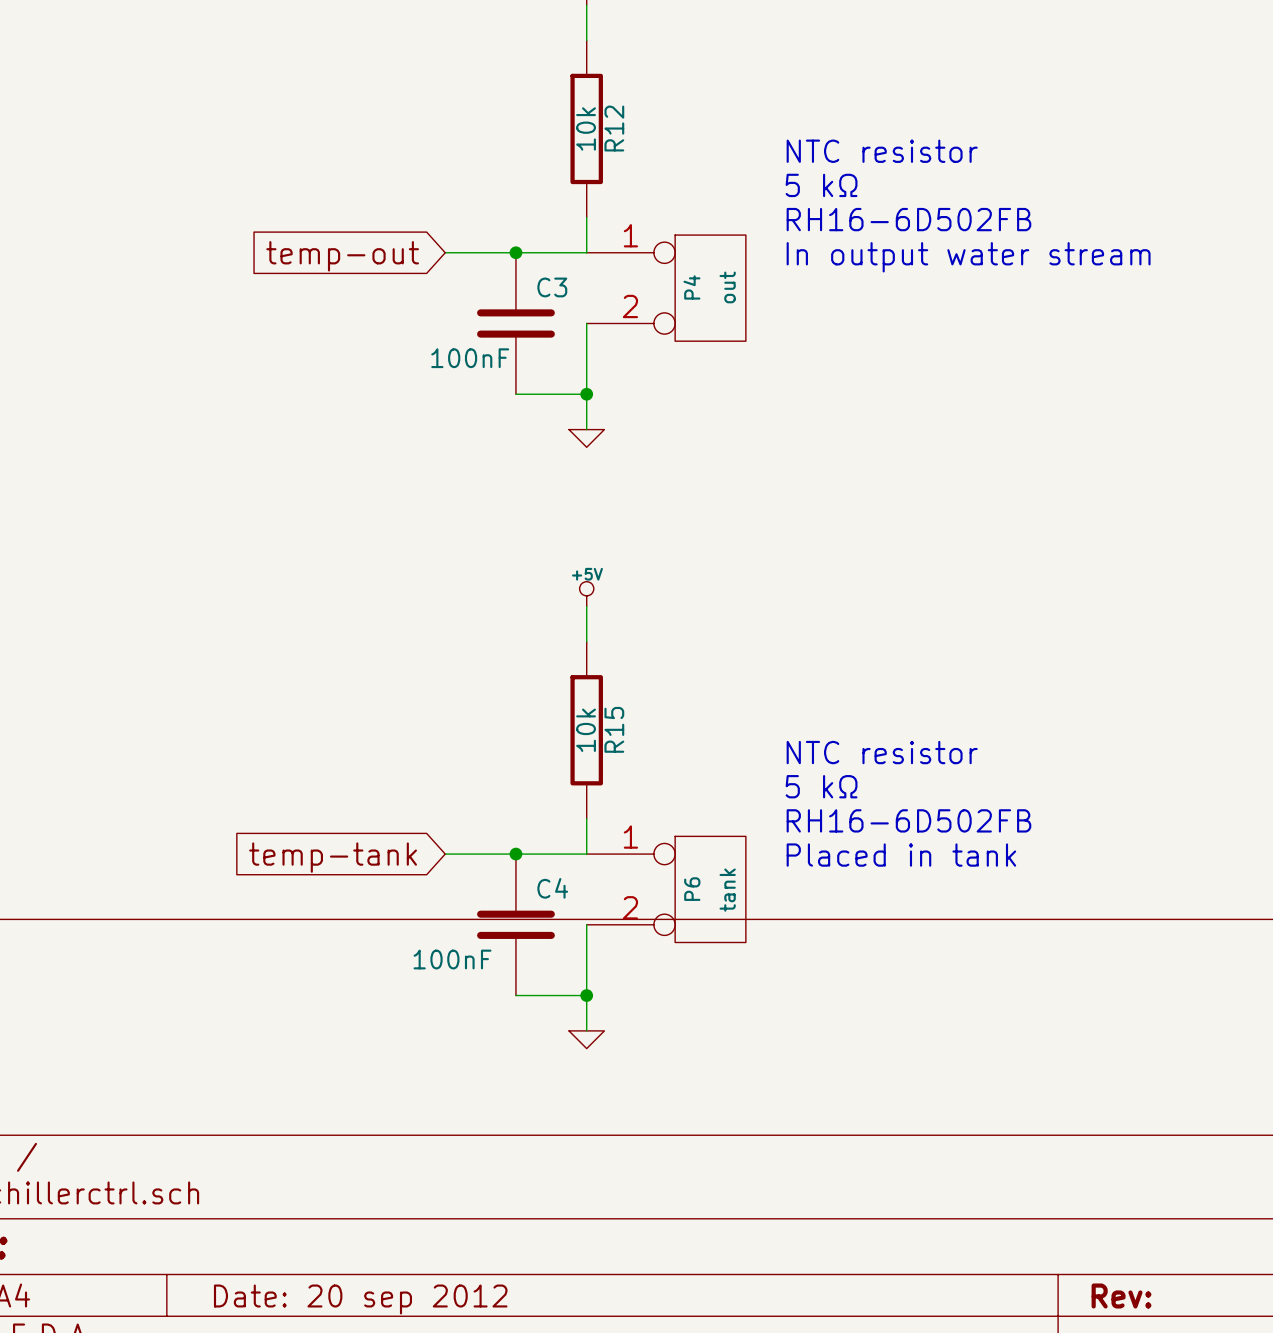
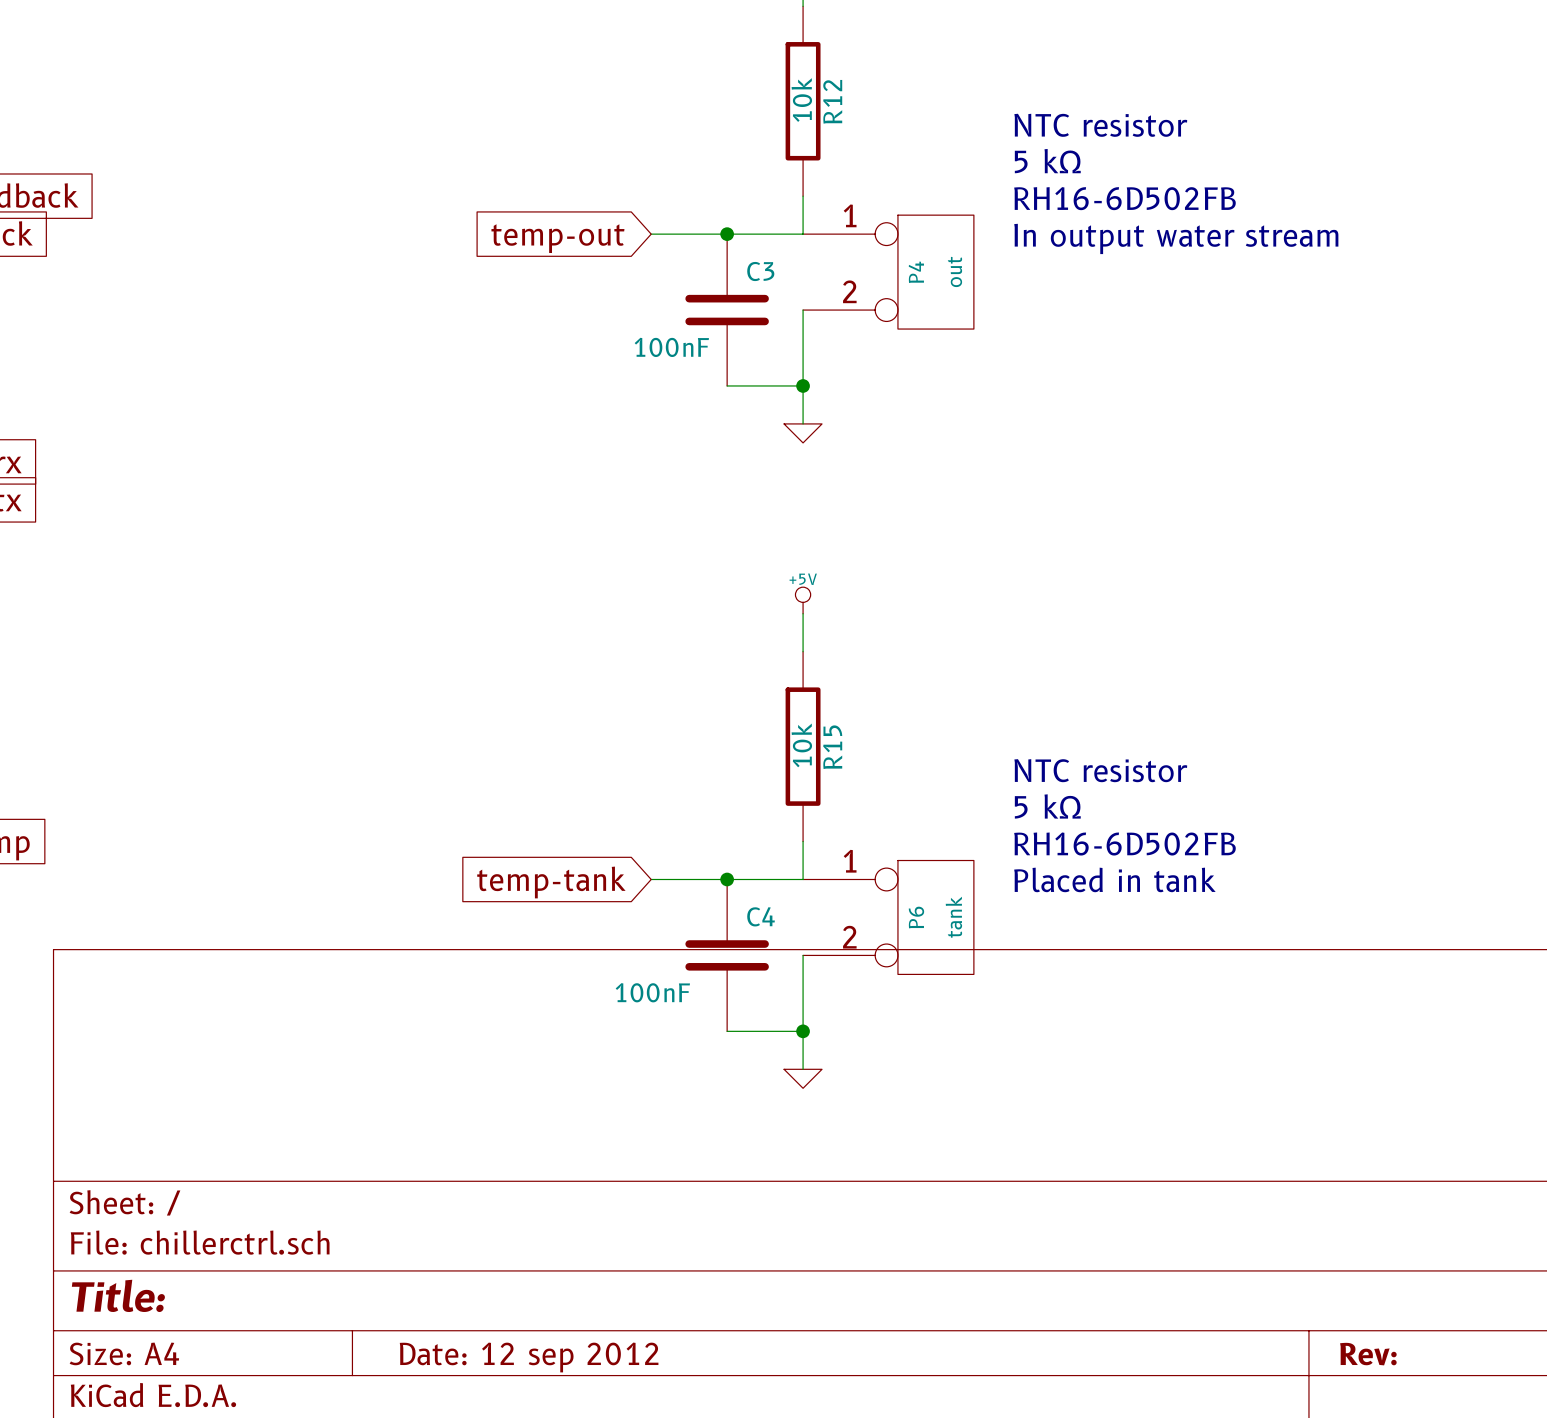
title block: Date: 20 sep 2012 (360, 1299) -> Date: 12 sep 2012 (529, 1357)

